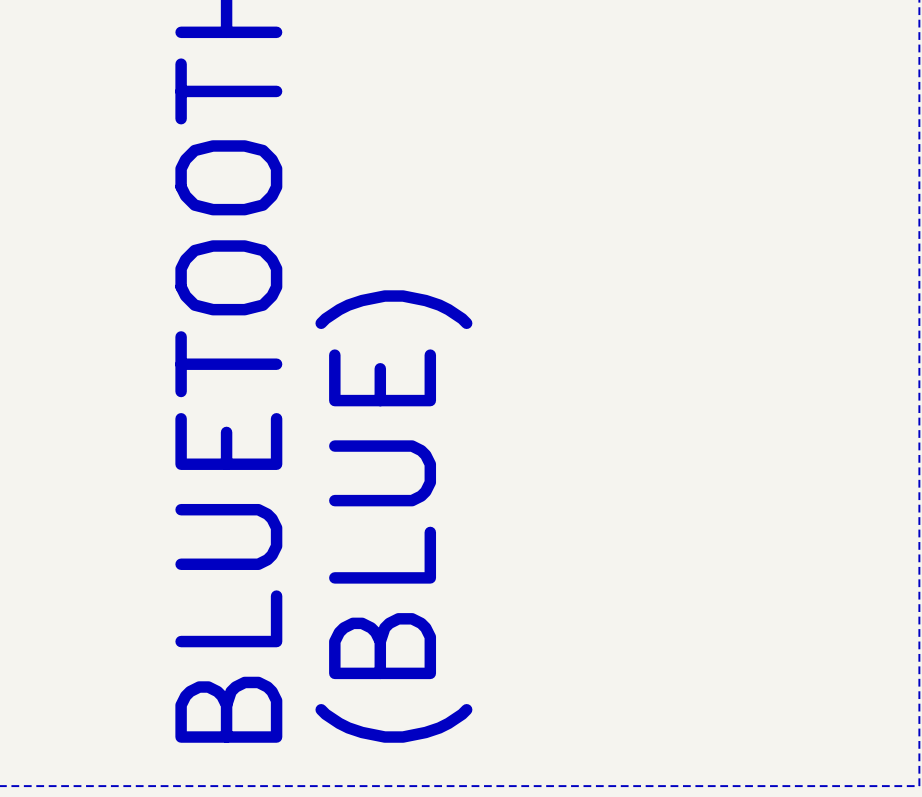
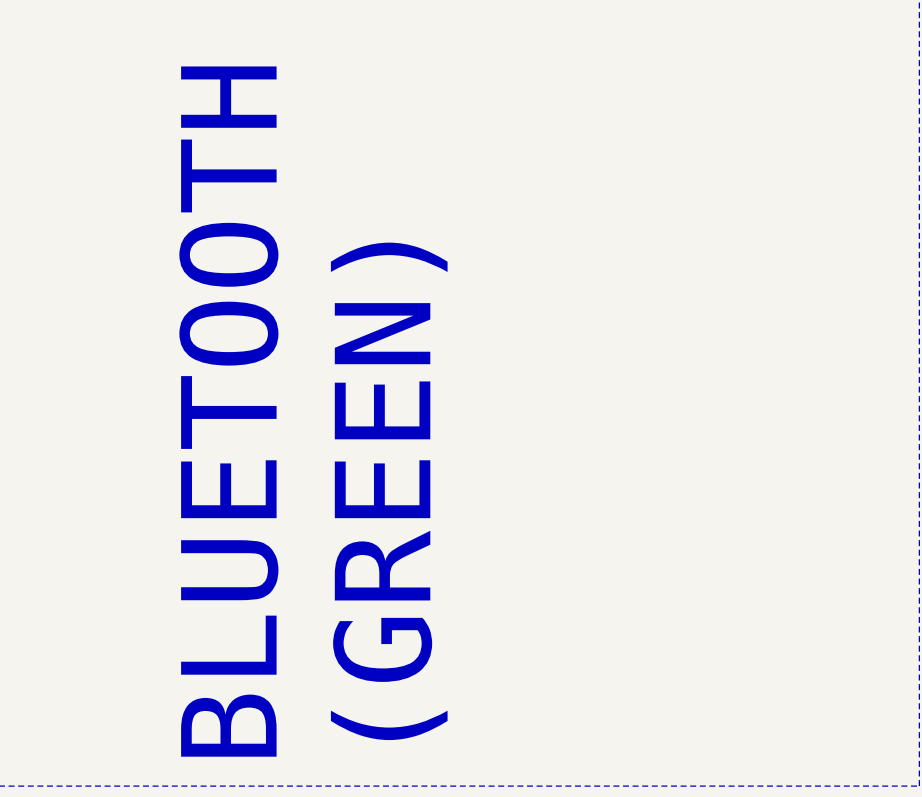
text: (BLUE) (393, 516) -> (GREEN) (389, 491)

